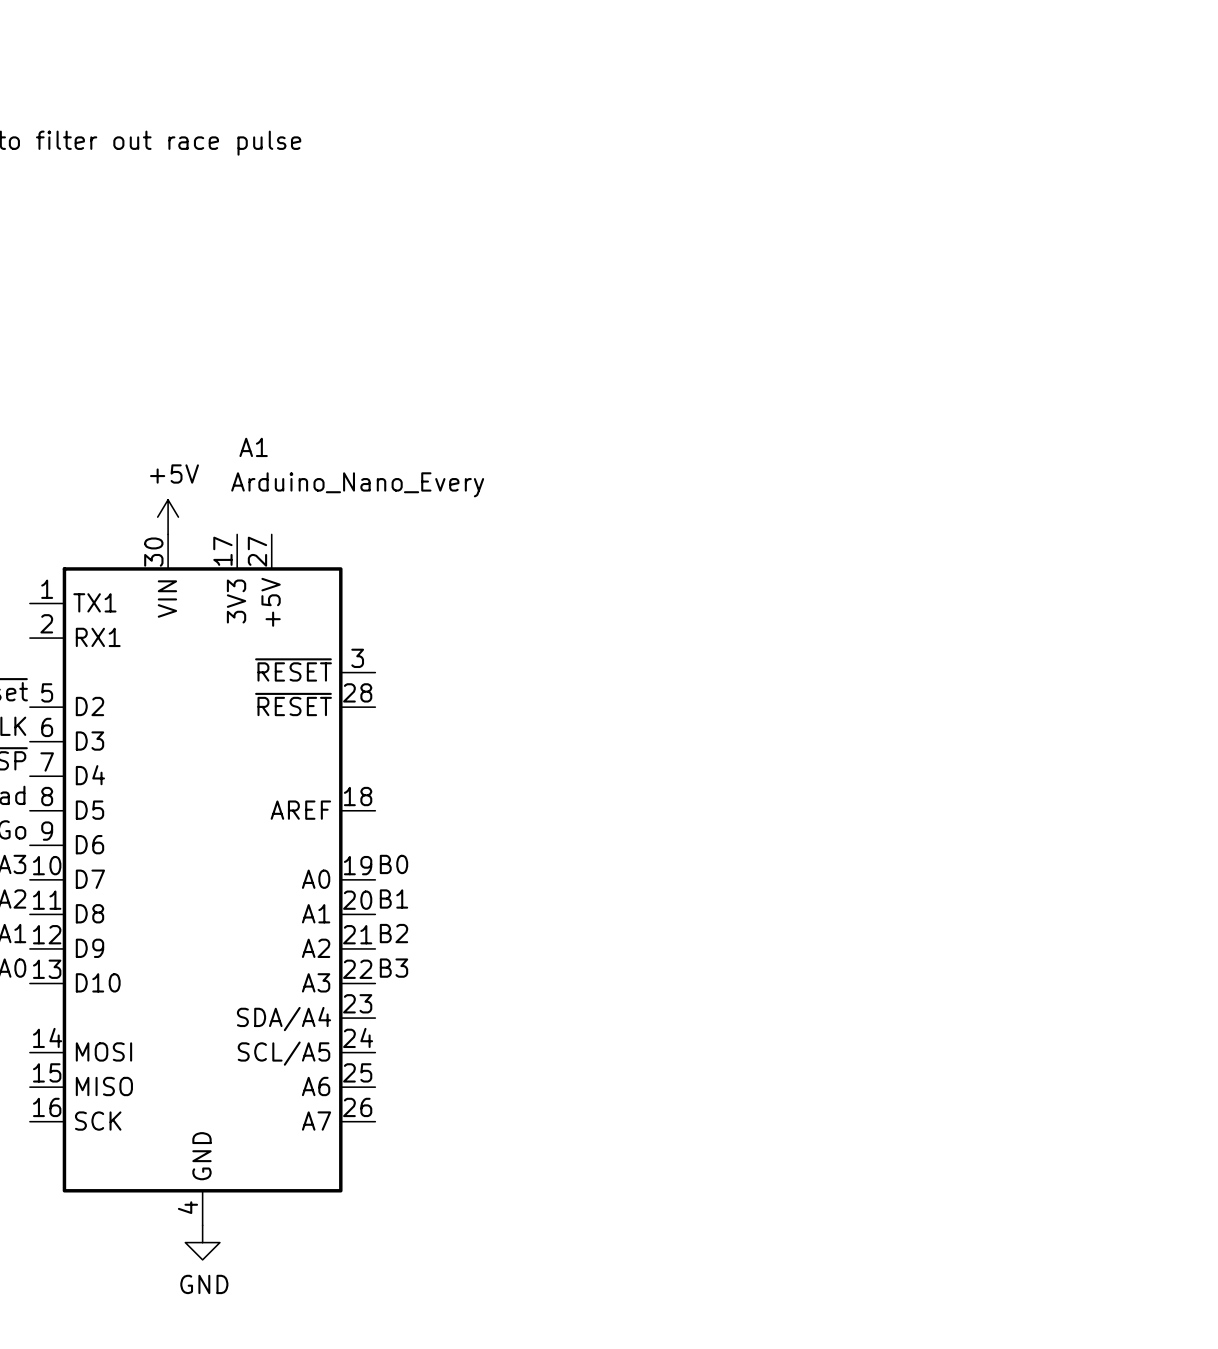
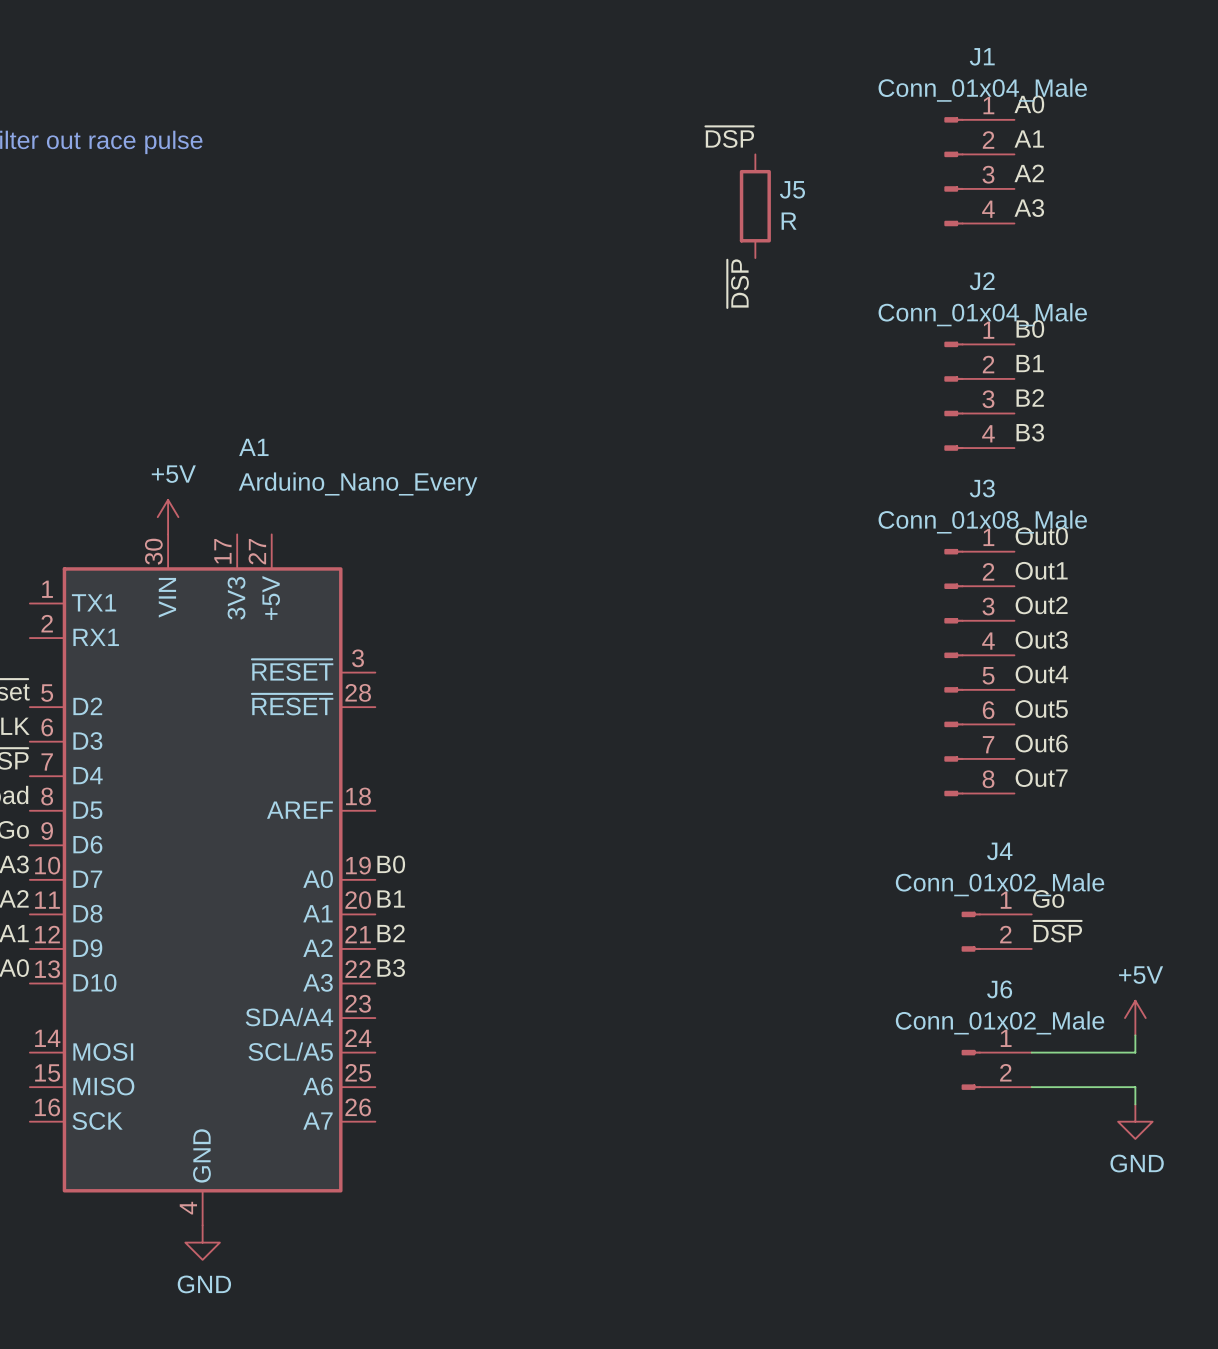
label: none -> A0 (1029, 104)
label: none -> ~{DSP} (729, 137)
label: none -> A1 (1029, 138)
J1: none -> Conn_01x04_Male (979, 171)
label: none -> A2 (1029, 173)
J5: none -> R (755, 206)
label: none -> A3 (1029, 208)
label: none -> ~{DSP} (738, 283)
label: none -> B0 (1030, 328)
label: none -> B1 (1030, 363)
J2: none -> Conn_01x04_Male (979, 396)
label: none -> B2 (1030, 397)
label: none -> B3 (1030, 432)
label: none -> Out0 (1041, 536)
label: none -> Out1 (1041, 570)
label: none -> Out2 (1041, 605)
label: none -> Out3 (1041, 639)
J3: none -> Conn_01x08_Male (979, 672)
label: none -> Out4 (1041, 674)
label: none -> Out5 (1041, 708)
label: none -> Out6 (1041, 743)
label: none -> Out7 (1041, 778)
label: none -> Go (1048, 898)
J4: none -> Conn_01x02_Male (996, 931)
label: none -> ~{DSP} (1057, 931)
power symbol: none -> +5V (1135, 1018)
wire: none -> (1135, 1035) (1135, 1052) (1031, 1052)
J6: none -> Conn_01x02_Male (996, 1069)
wire: none -> (1031, 1087) (1135, 1087) (1135, 1104)
power symbol: none -> GND (1135, 1121)

